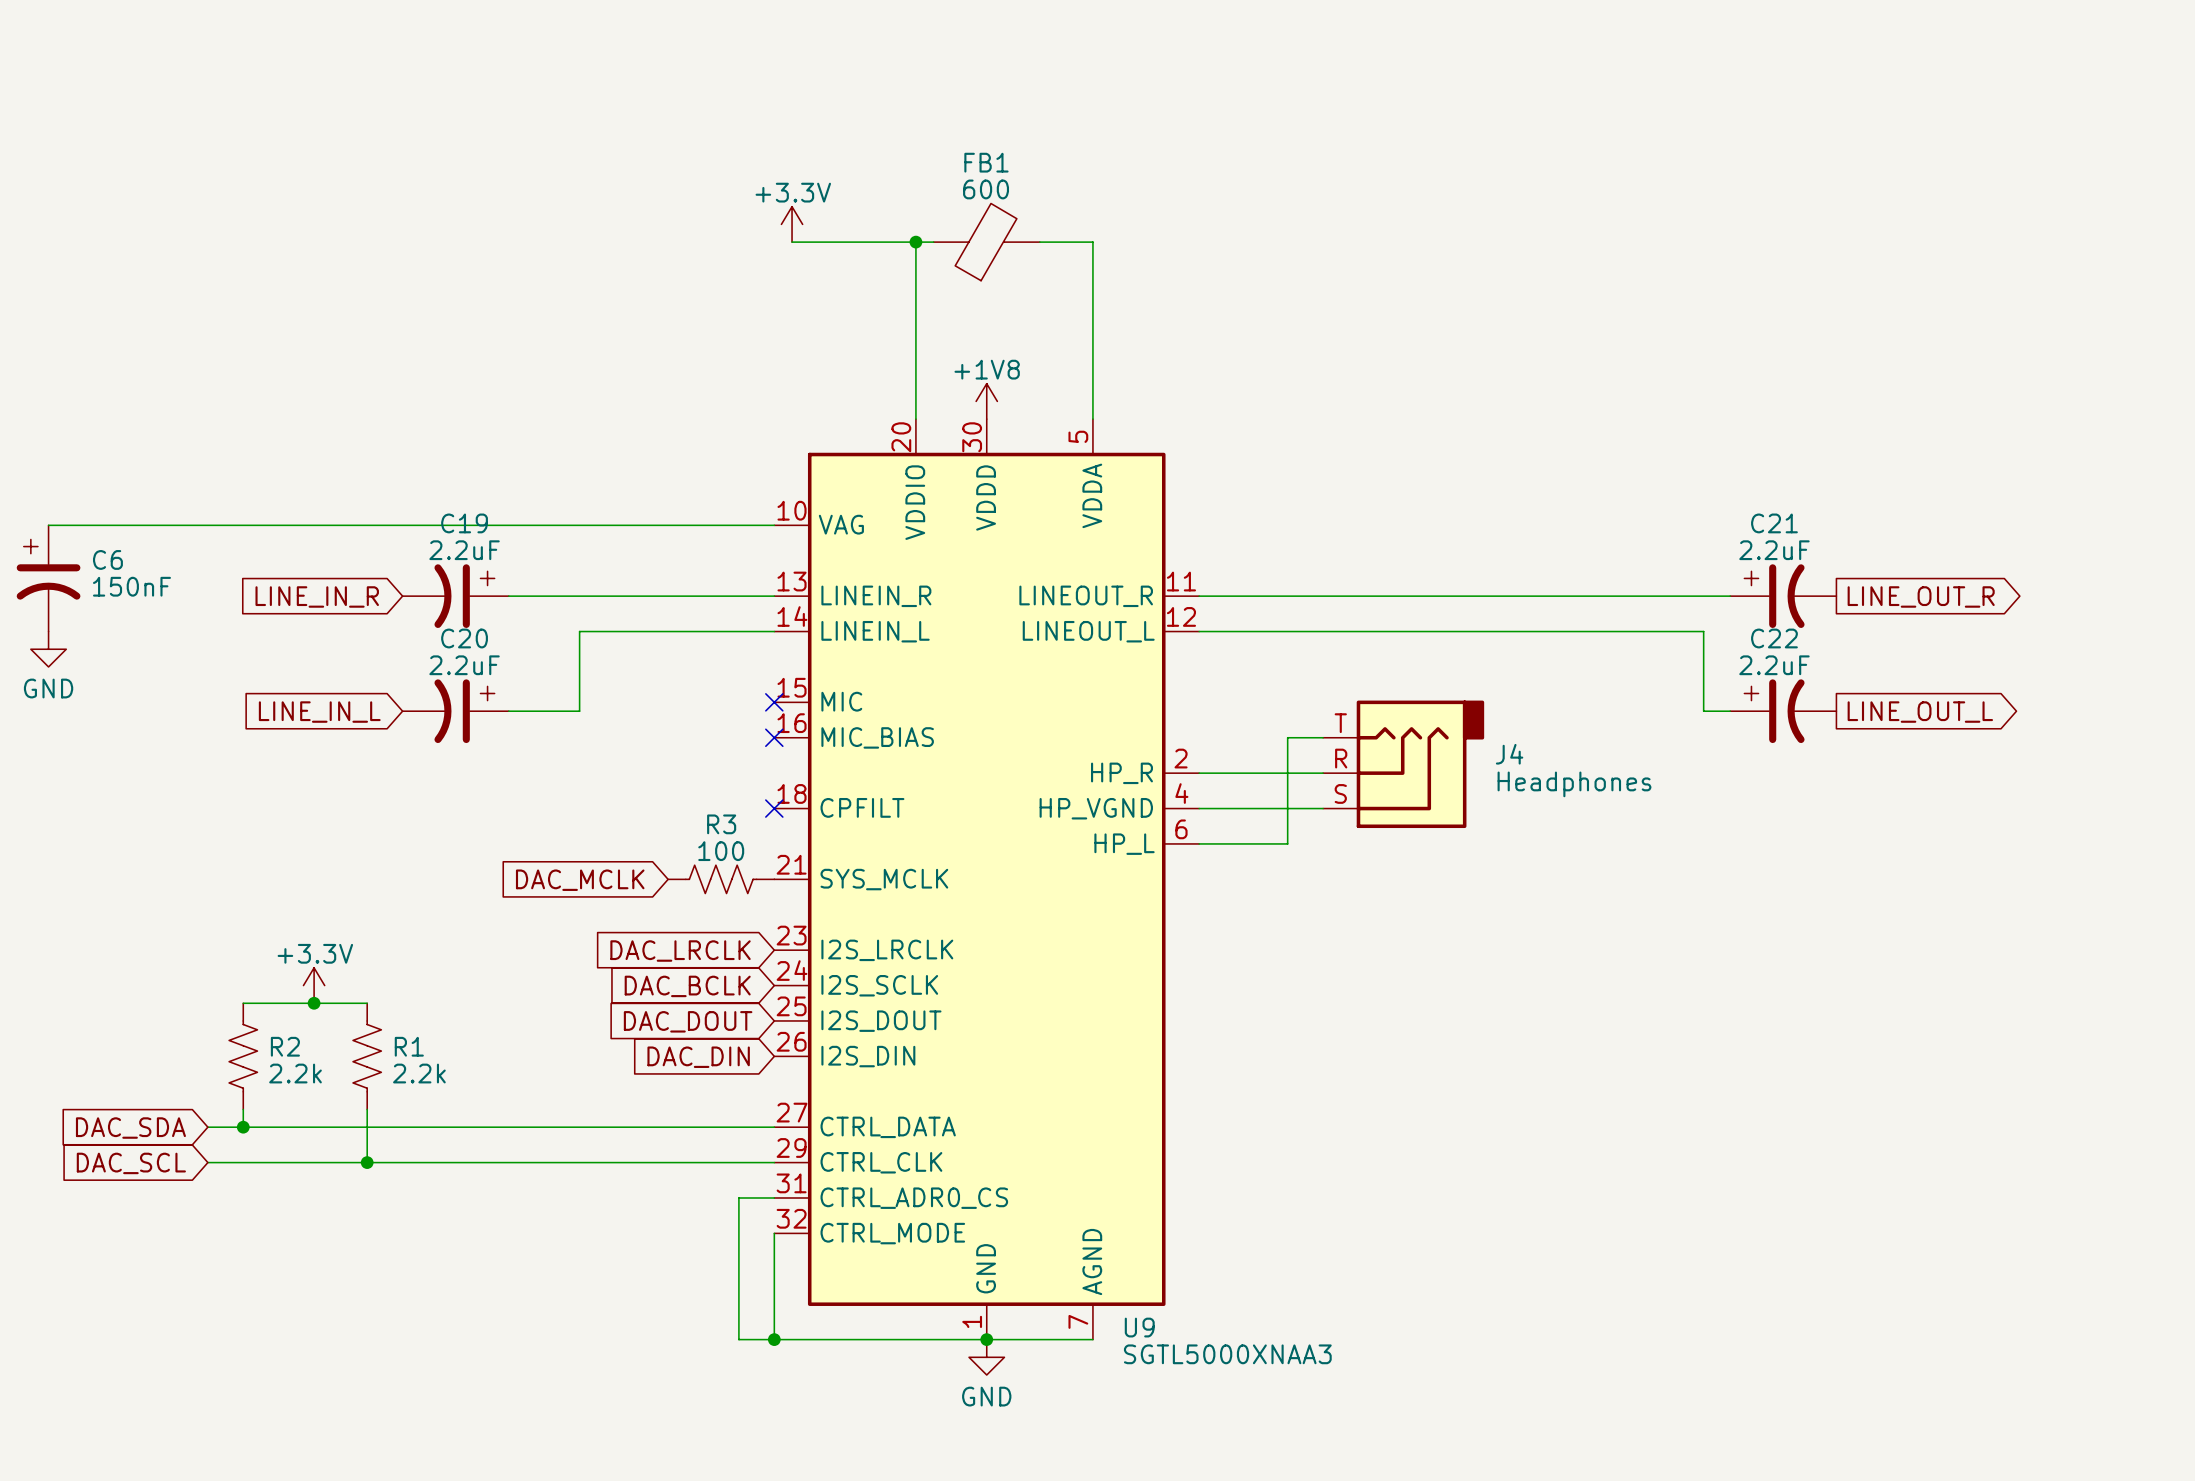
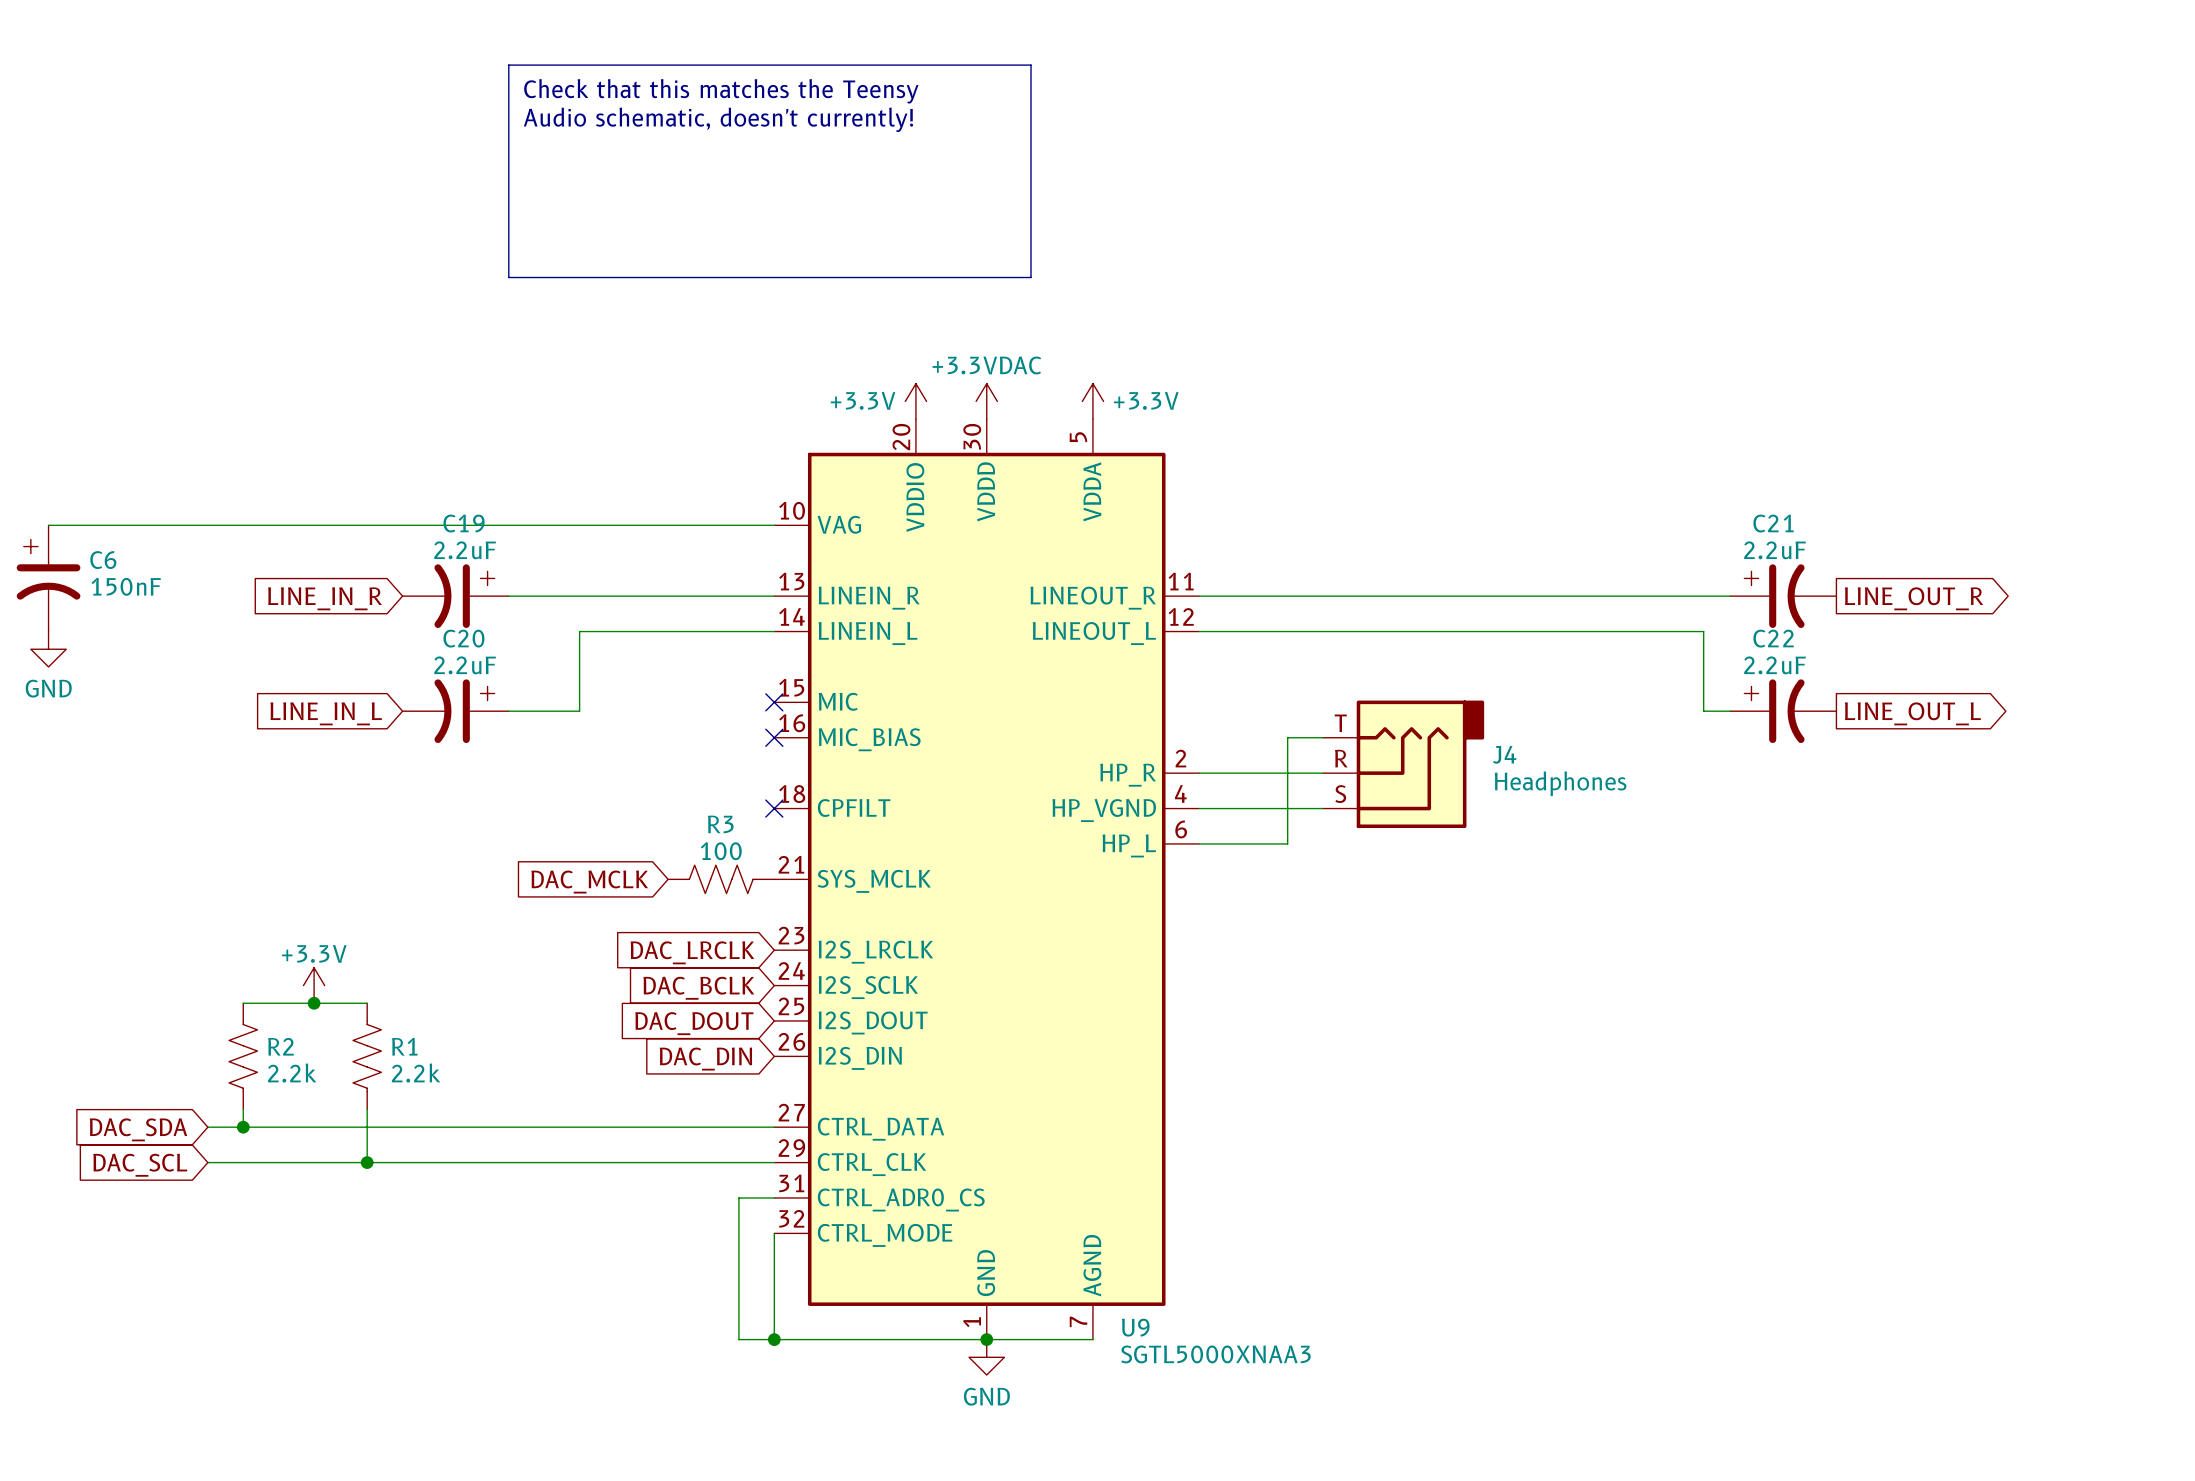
line: none -> (508, 65) (1031, 65) (1031, 277) (508, 277) (508, 65)
text: none -> Check that this matches the Teensy (721, 91)
text: none -> Audio schematic, doesn't currently! (718, 119)
power symbol: +3.3V (792, 224) -> none
wire: (792, 242) (933, 242) -> none
wire: (915, 242) (915, 419) -> none
junction: (915, 242) -> none
FB1: 600 (986, 242) -> none
wire: (1039, 242) (1092, 242) (1092, 419) -> none
power symbol: none -> +3.3V (915, 401)
power symbol: +1V8 (986, 401) -> +3.3VDAC (986, 401)
power symbol: none -> +3.3V (1092, 401)

